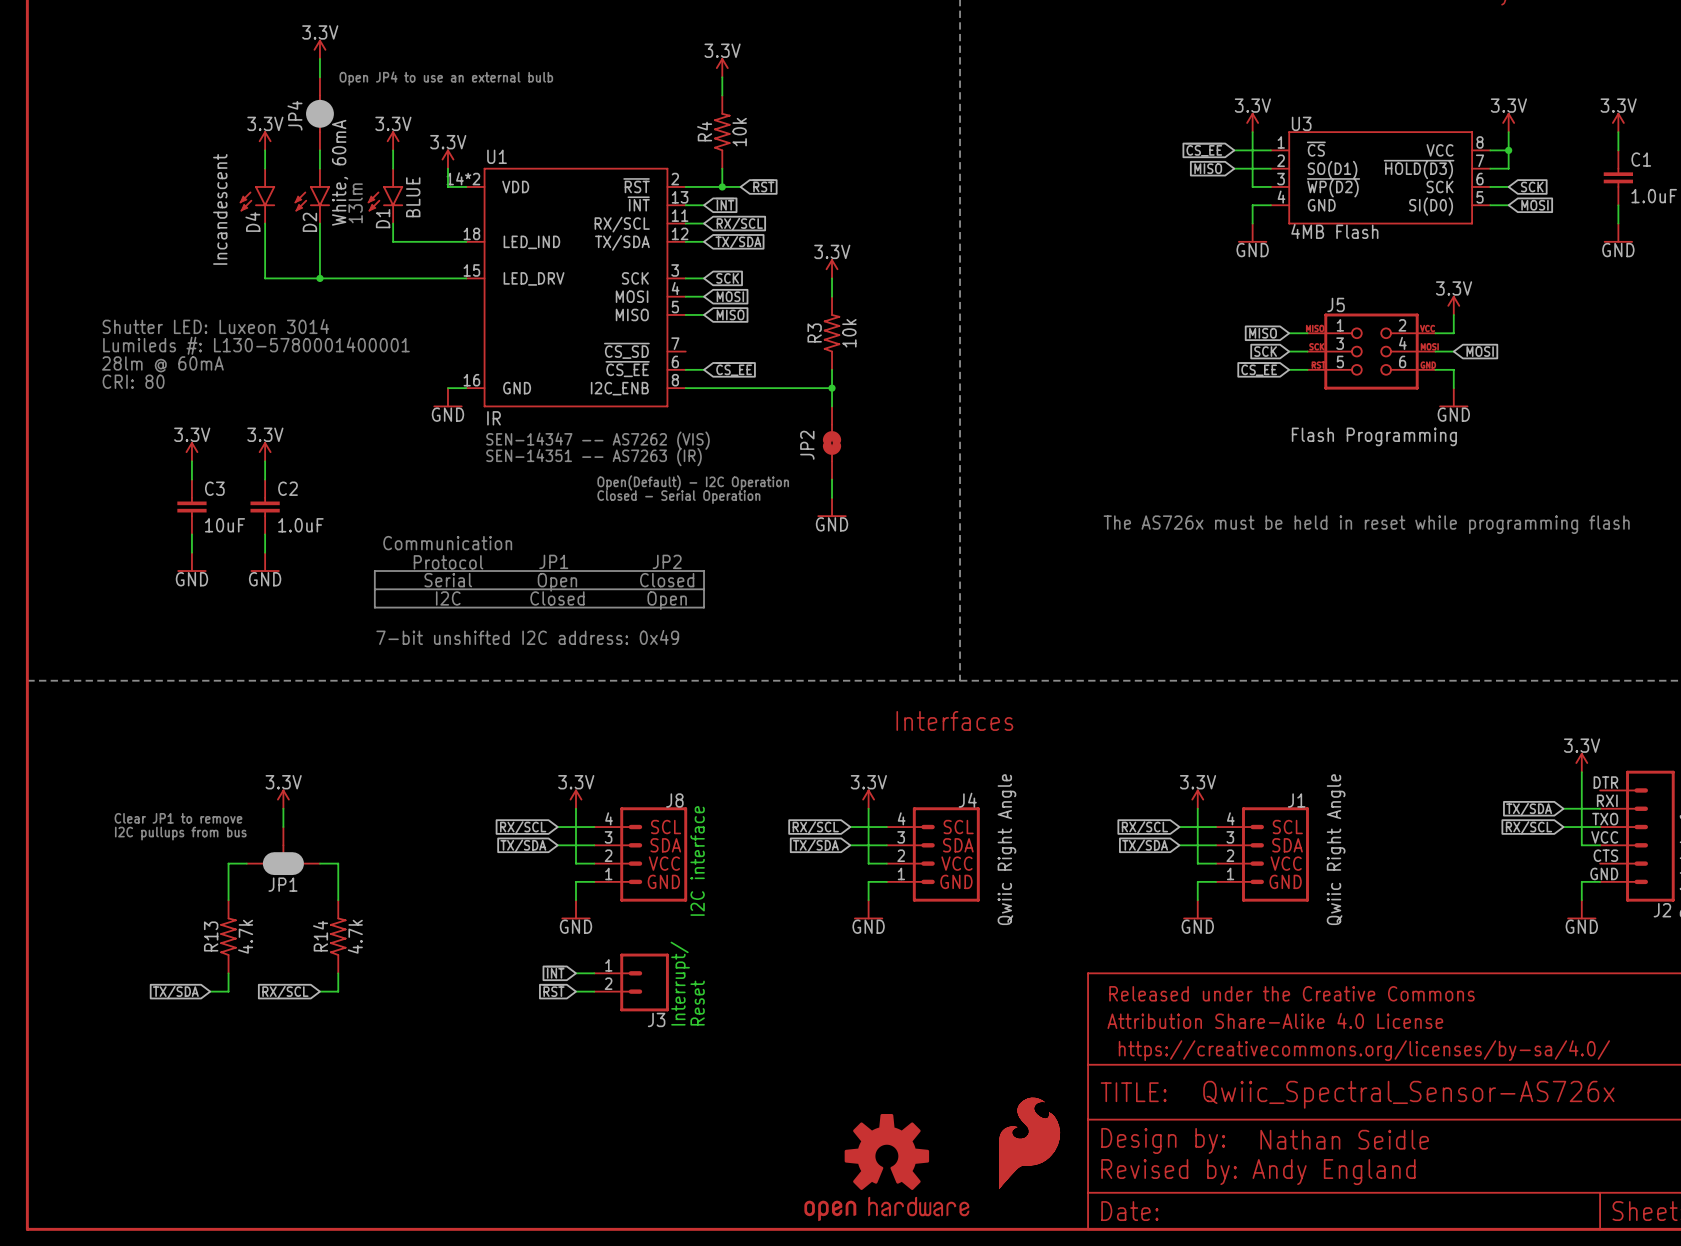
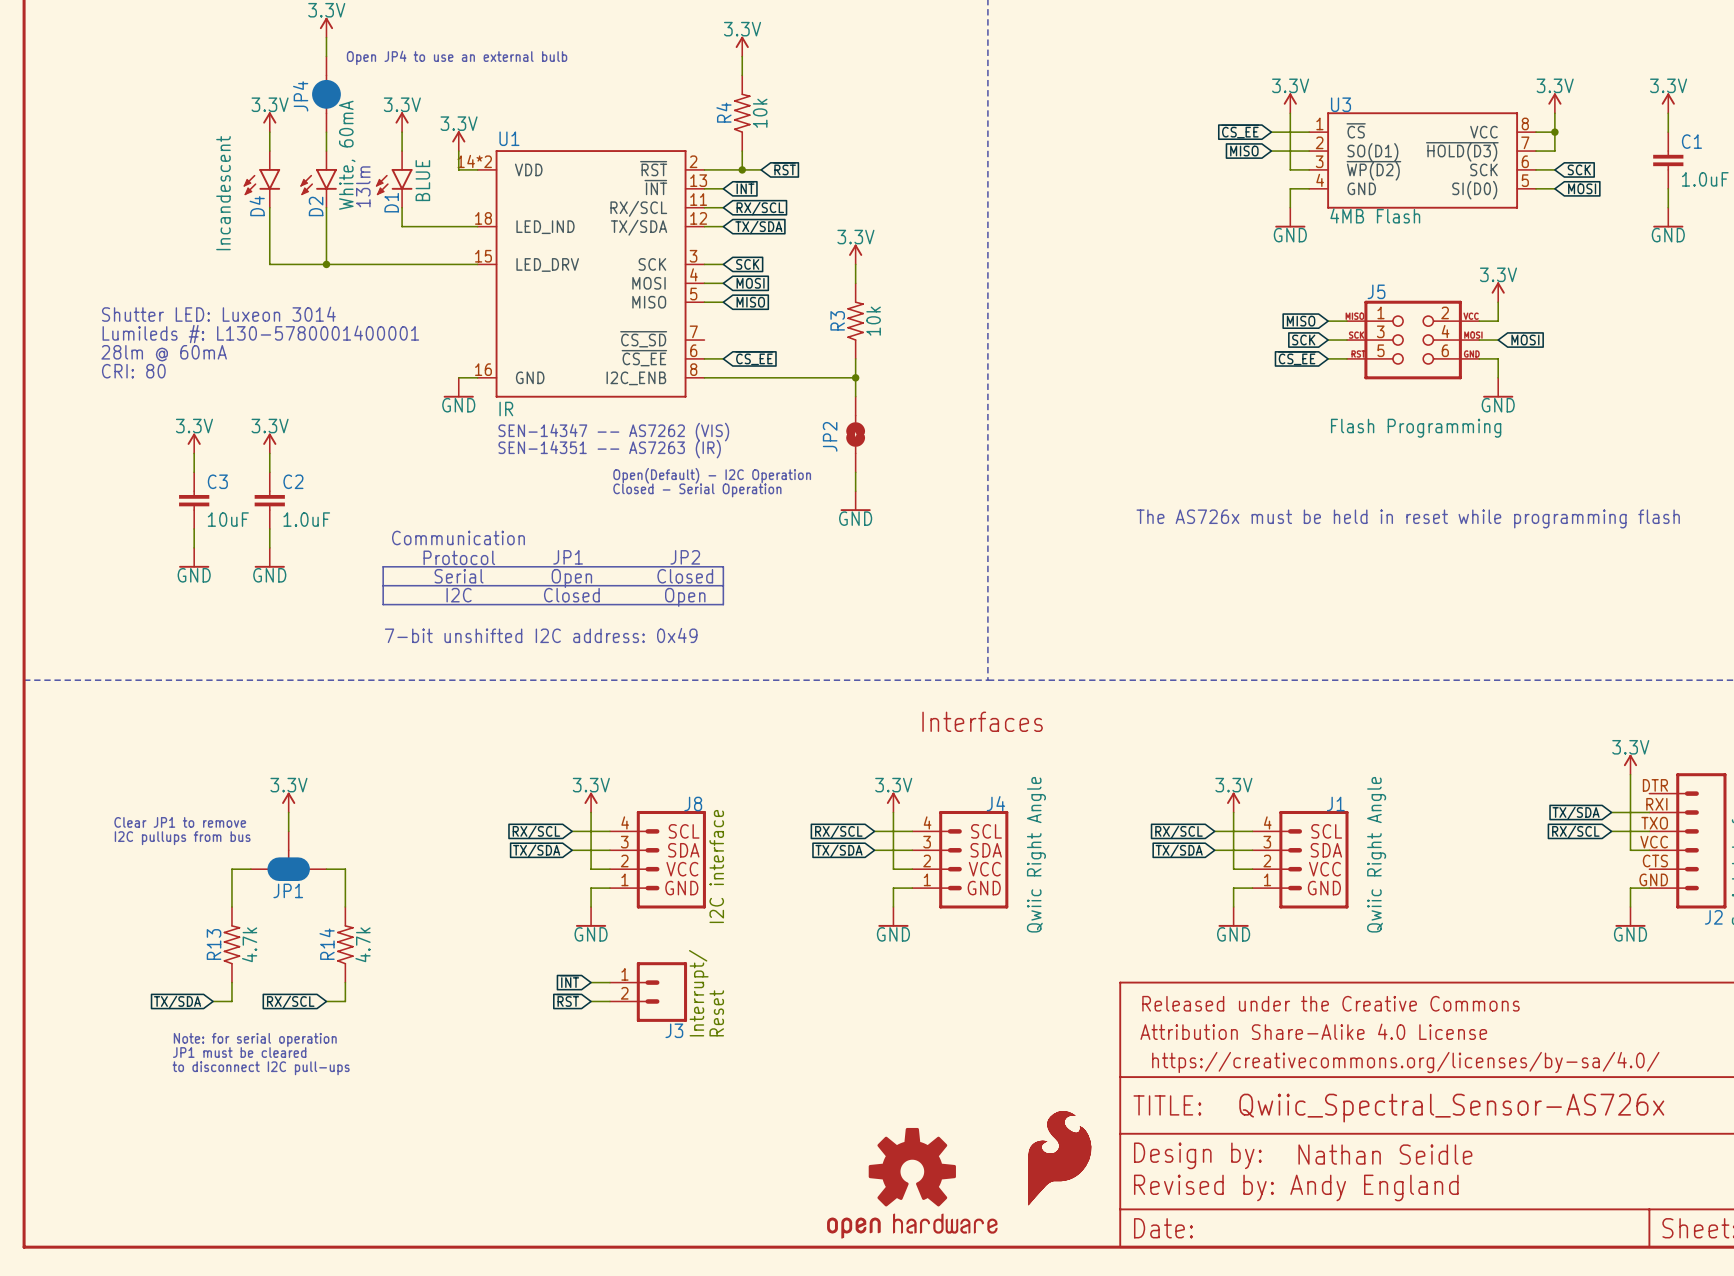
text: none -> Note: for serial operation (255, 1039)
text: none -> JP1 must be cleared (239, 1052)
text: none -> to disconnect I2C pull-ups (261, 1068)

